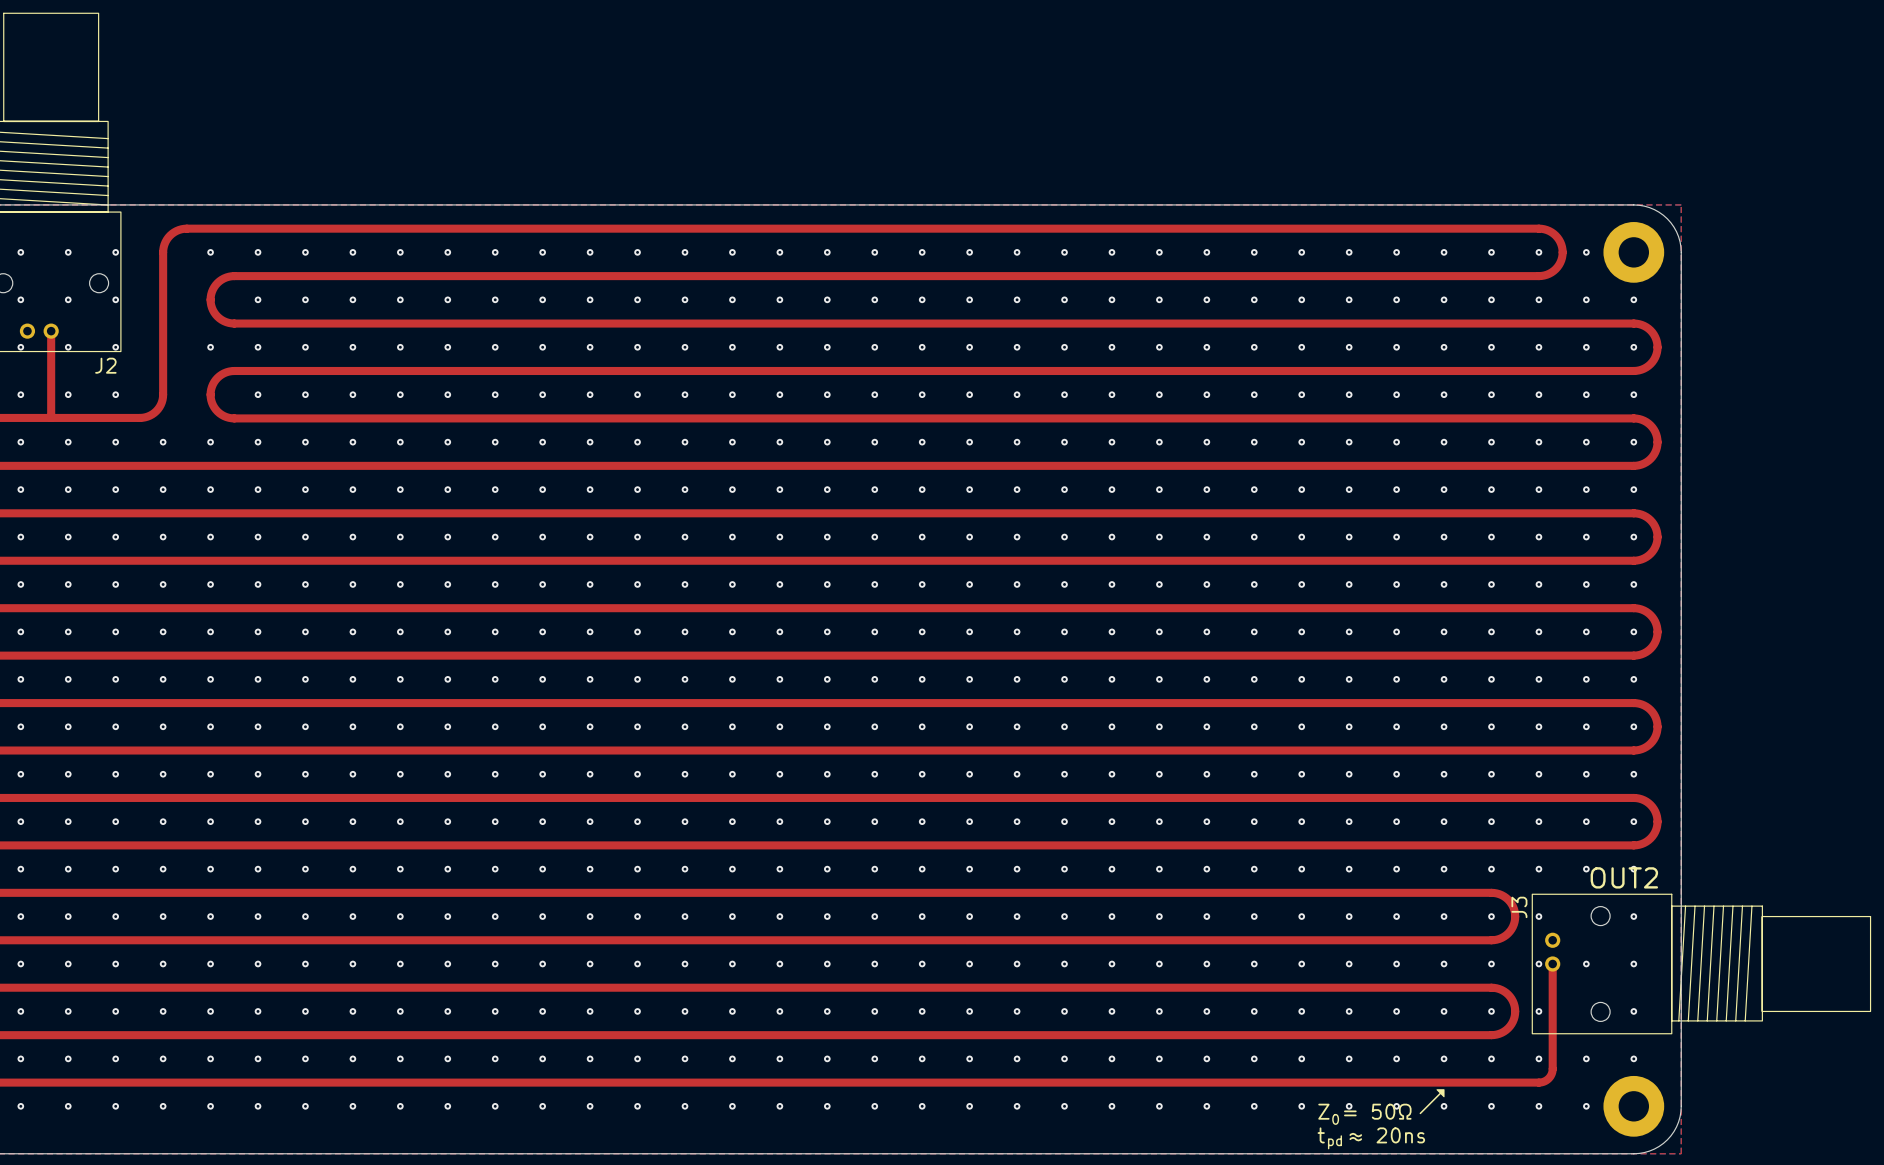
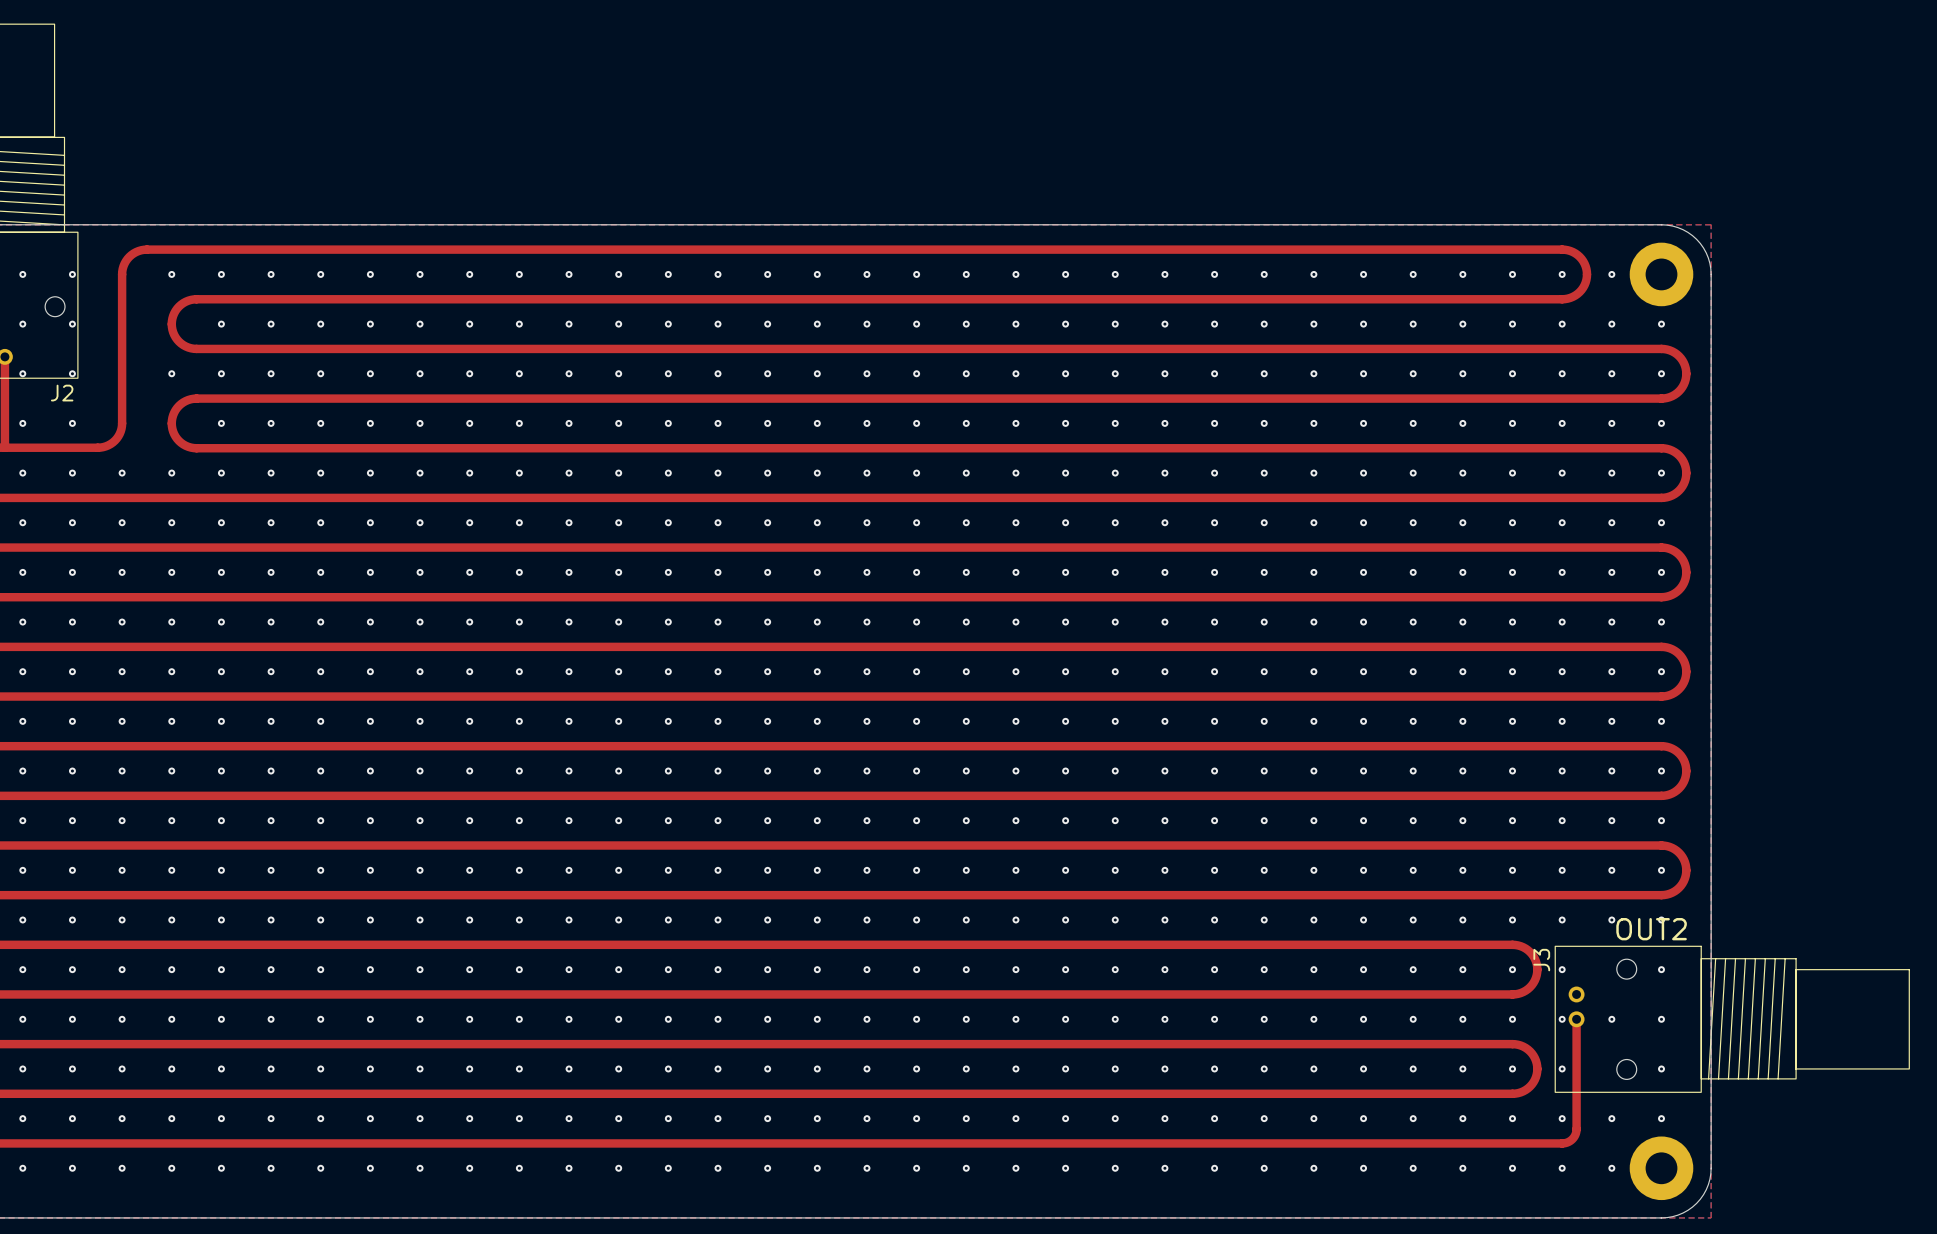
drawing: [1436, 1089, 1445, 1098] -> none
line: (1441, 1092) (1420, 1113) -> none
text: Z = 50Ω (1364, 1111) -> none
text: 0 (1335, 1119) -> none
text: t ≈ 20ns (1371, 1135) -> none
text: pd (1334, 1142) -> none

